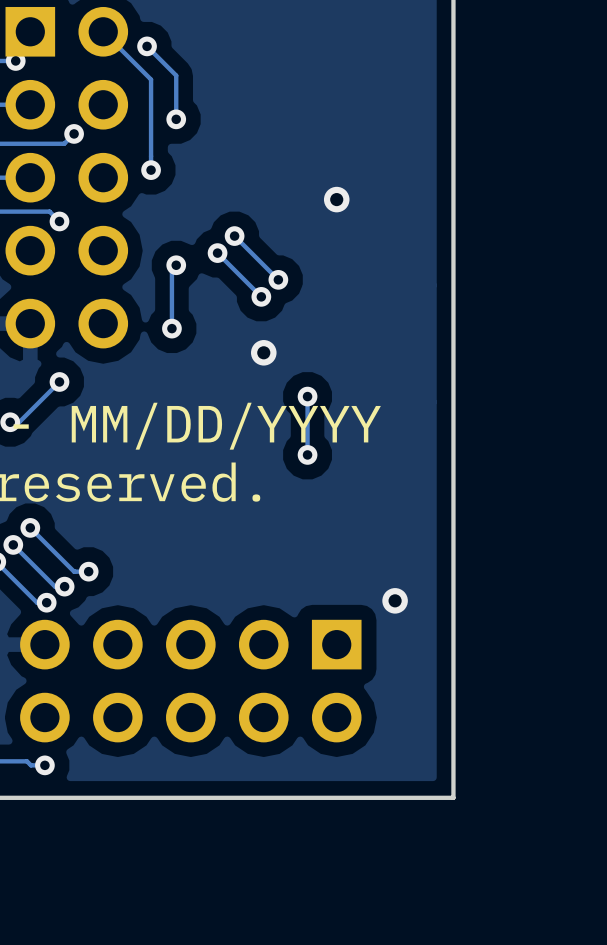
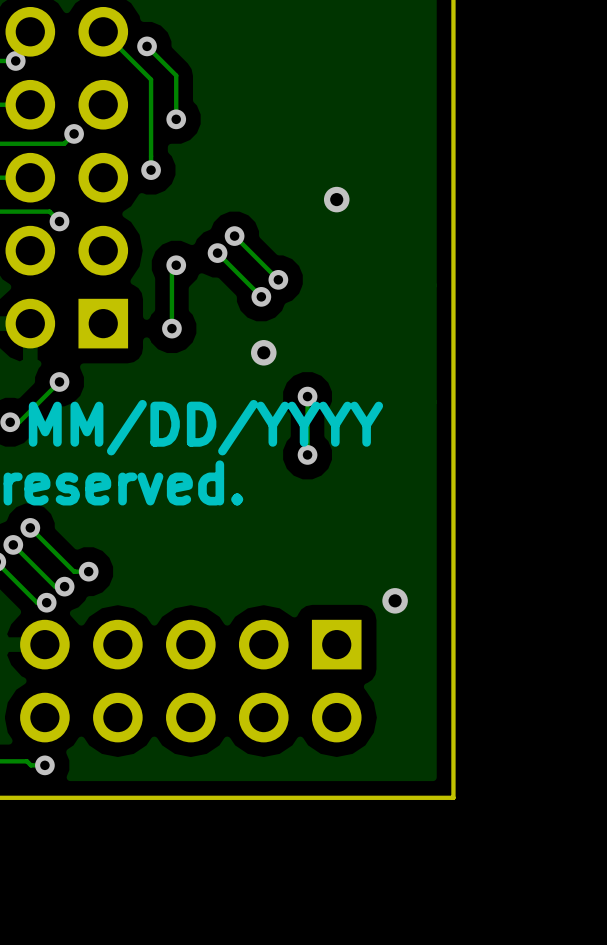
part rotation: 0° (66, 177) -> 180° (66, 177)

